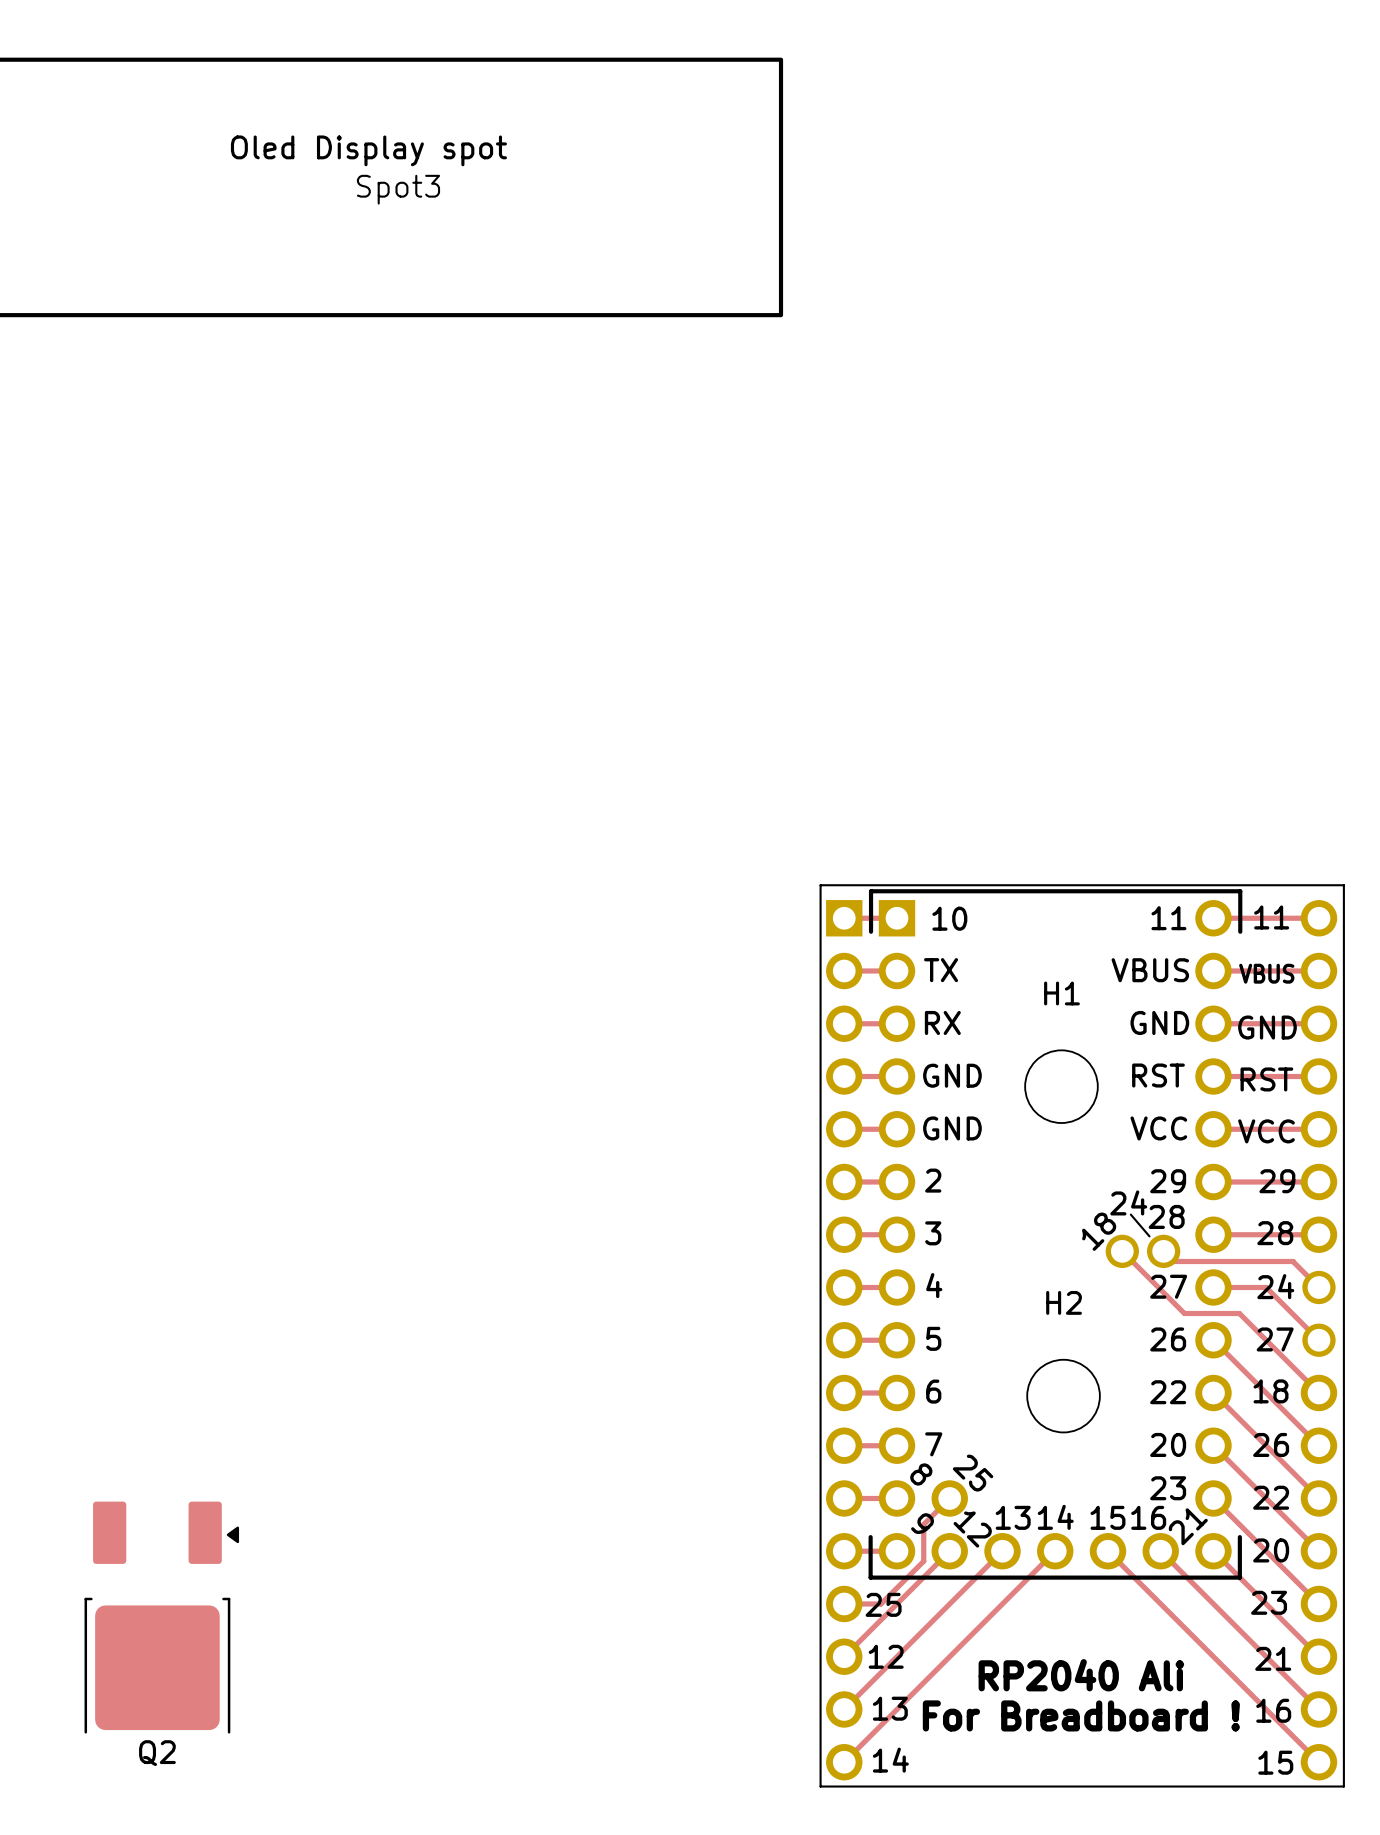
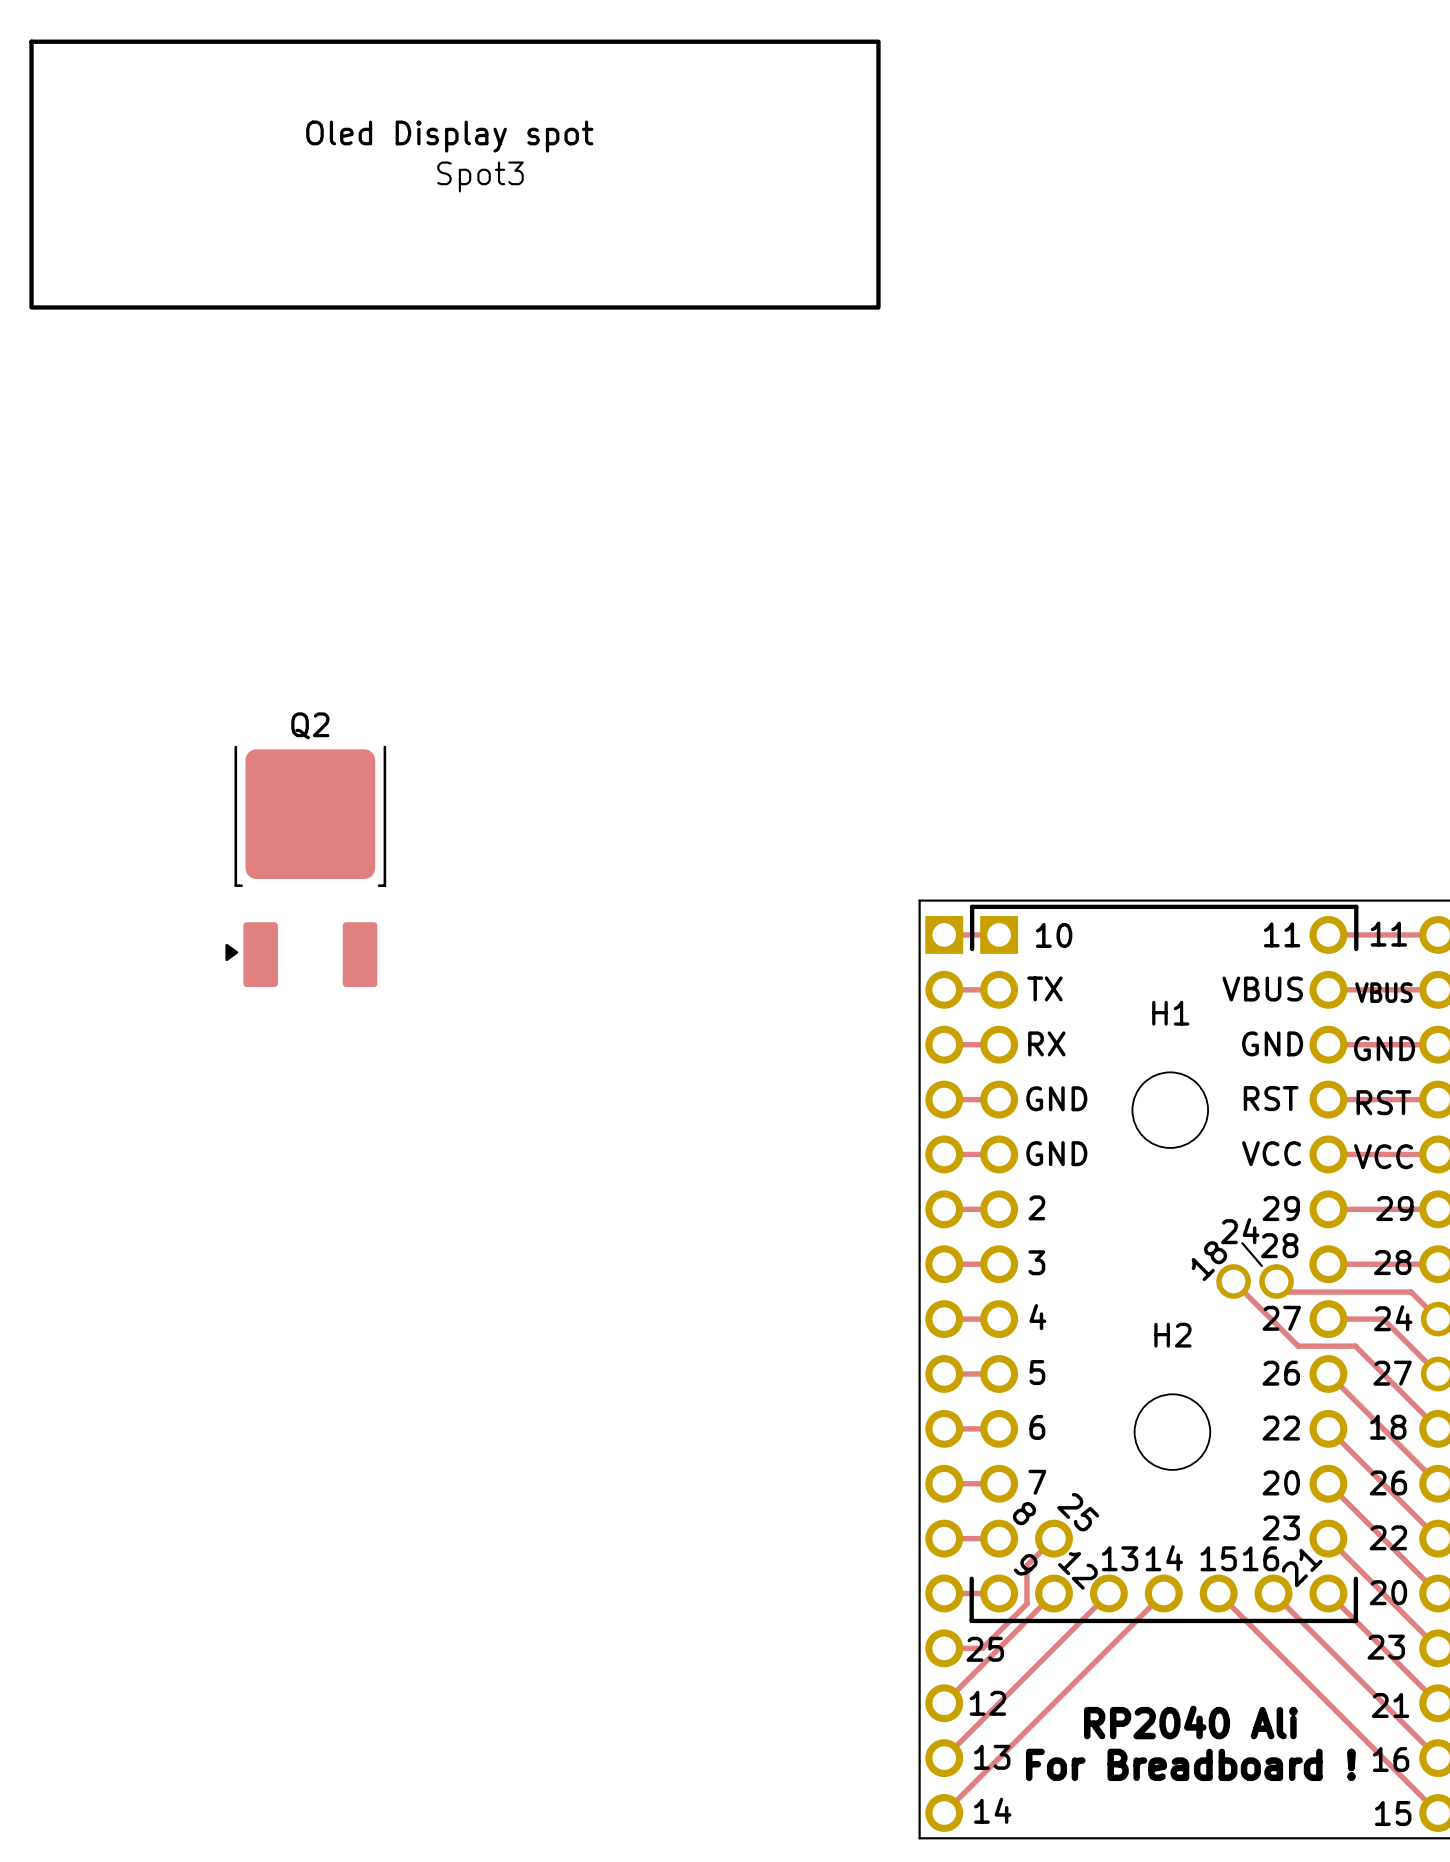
Q2 rotation: 0° (161, 1617) -> 180° (305, 866)
Q2 position: (161, 1617) -> (305, 866)

